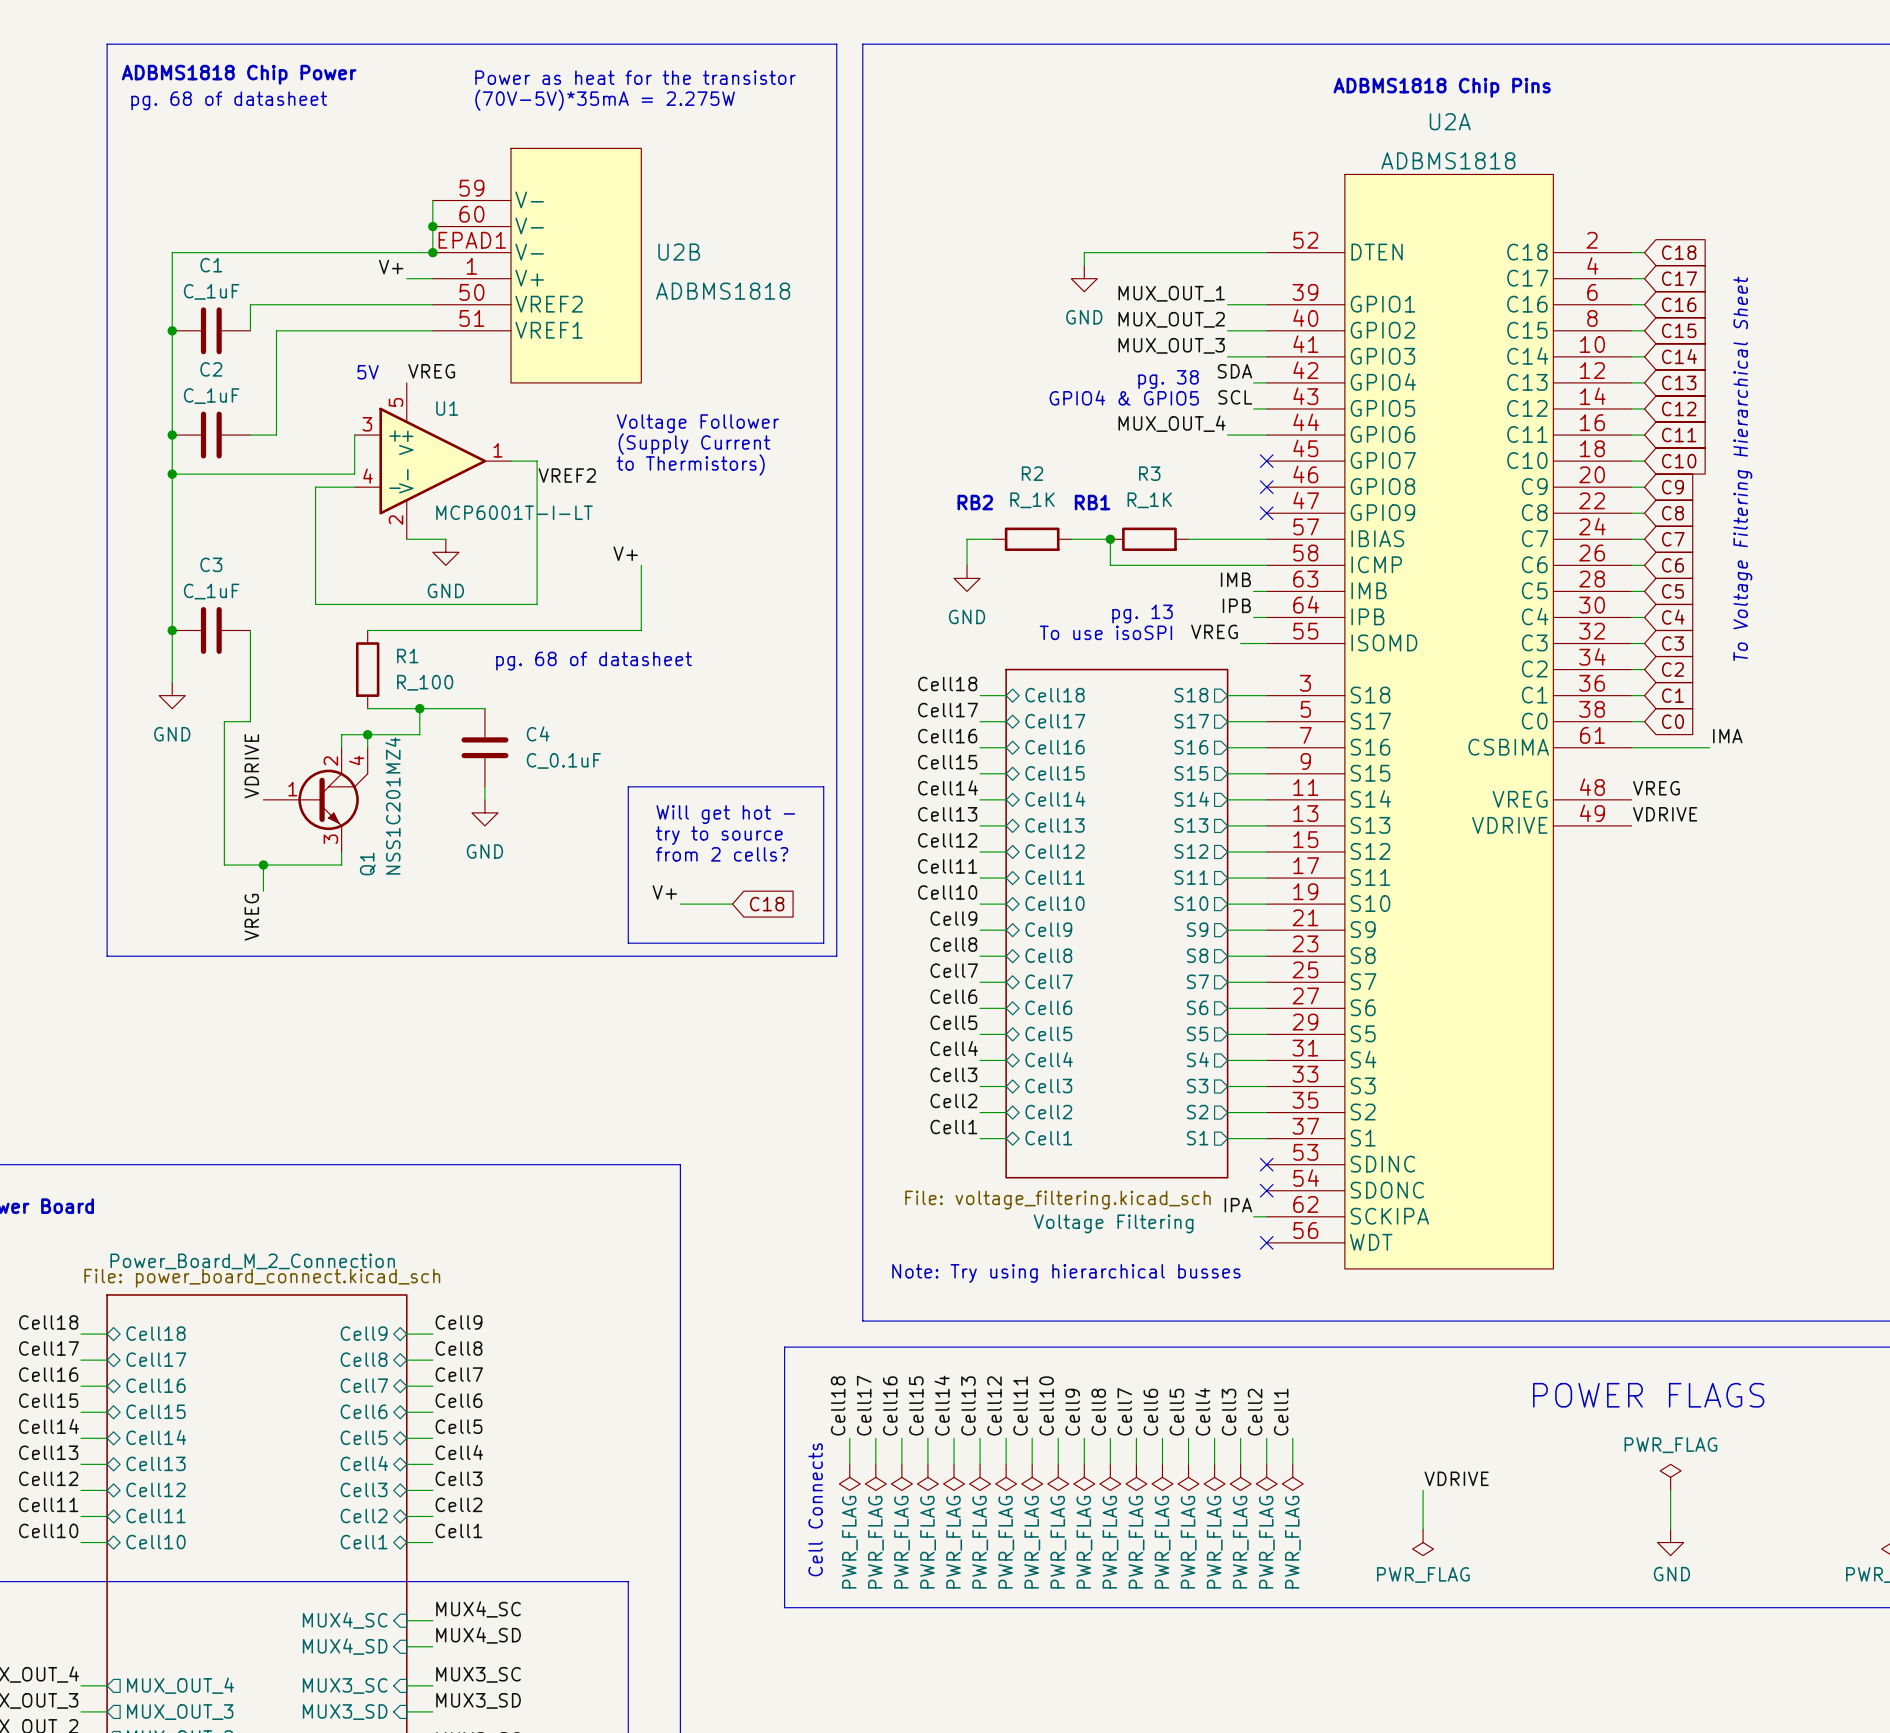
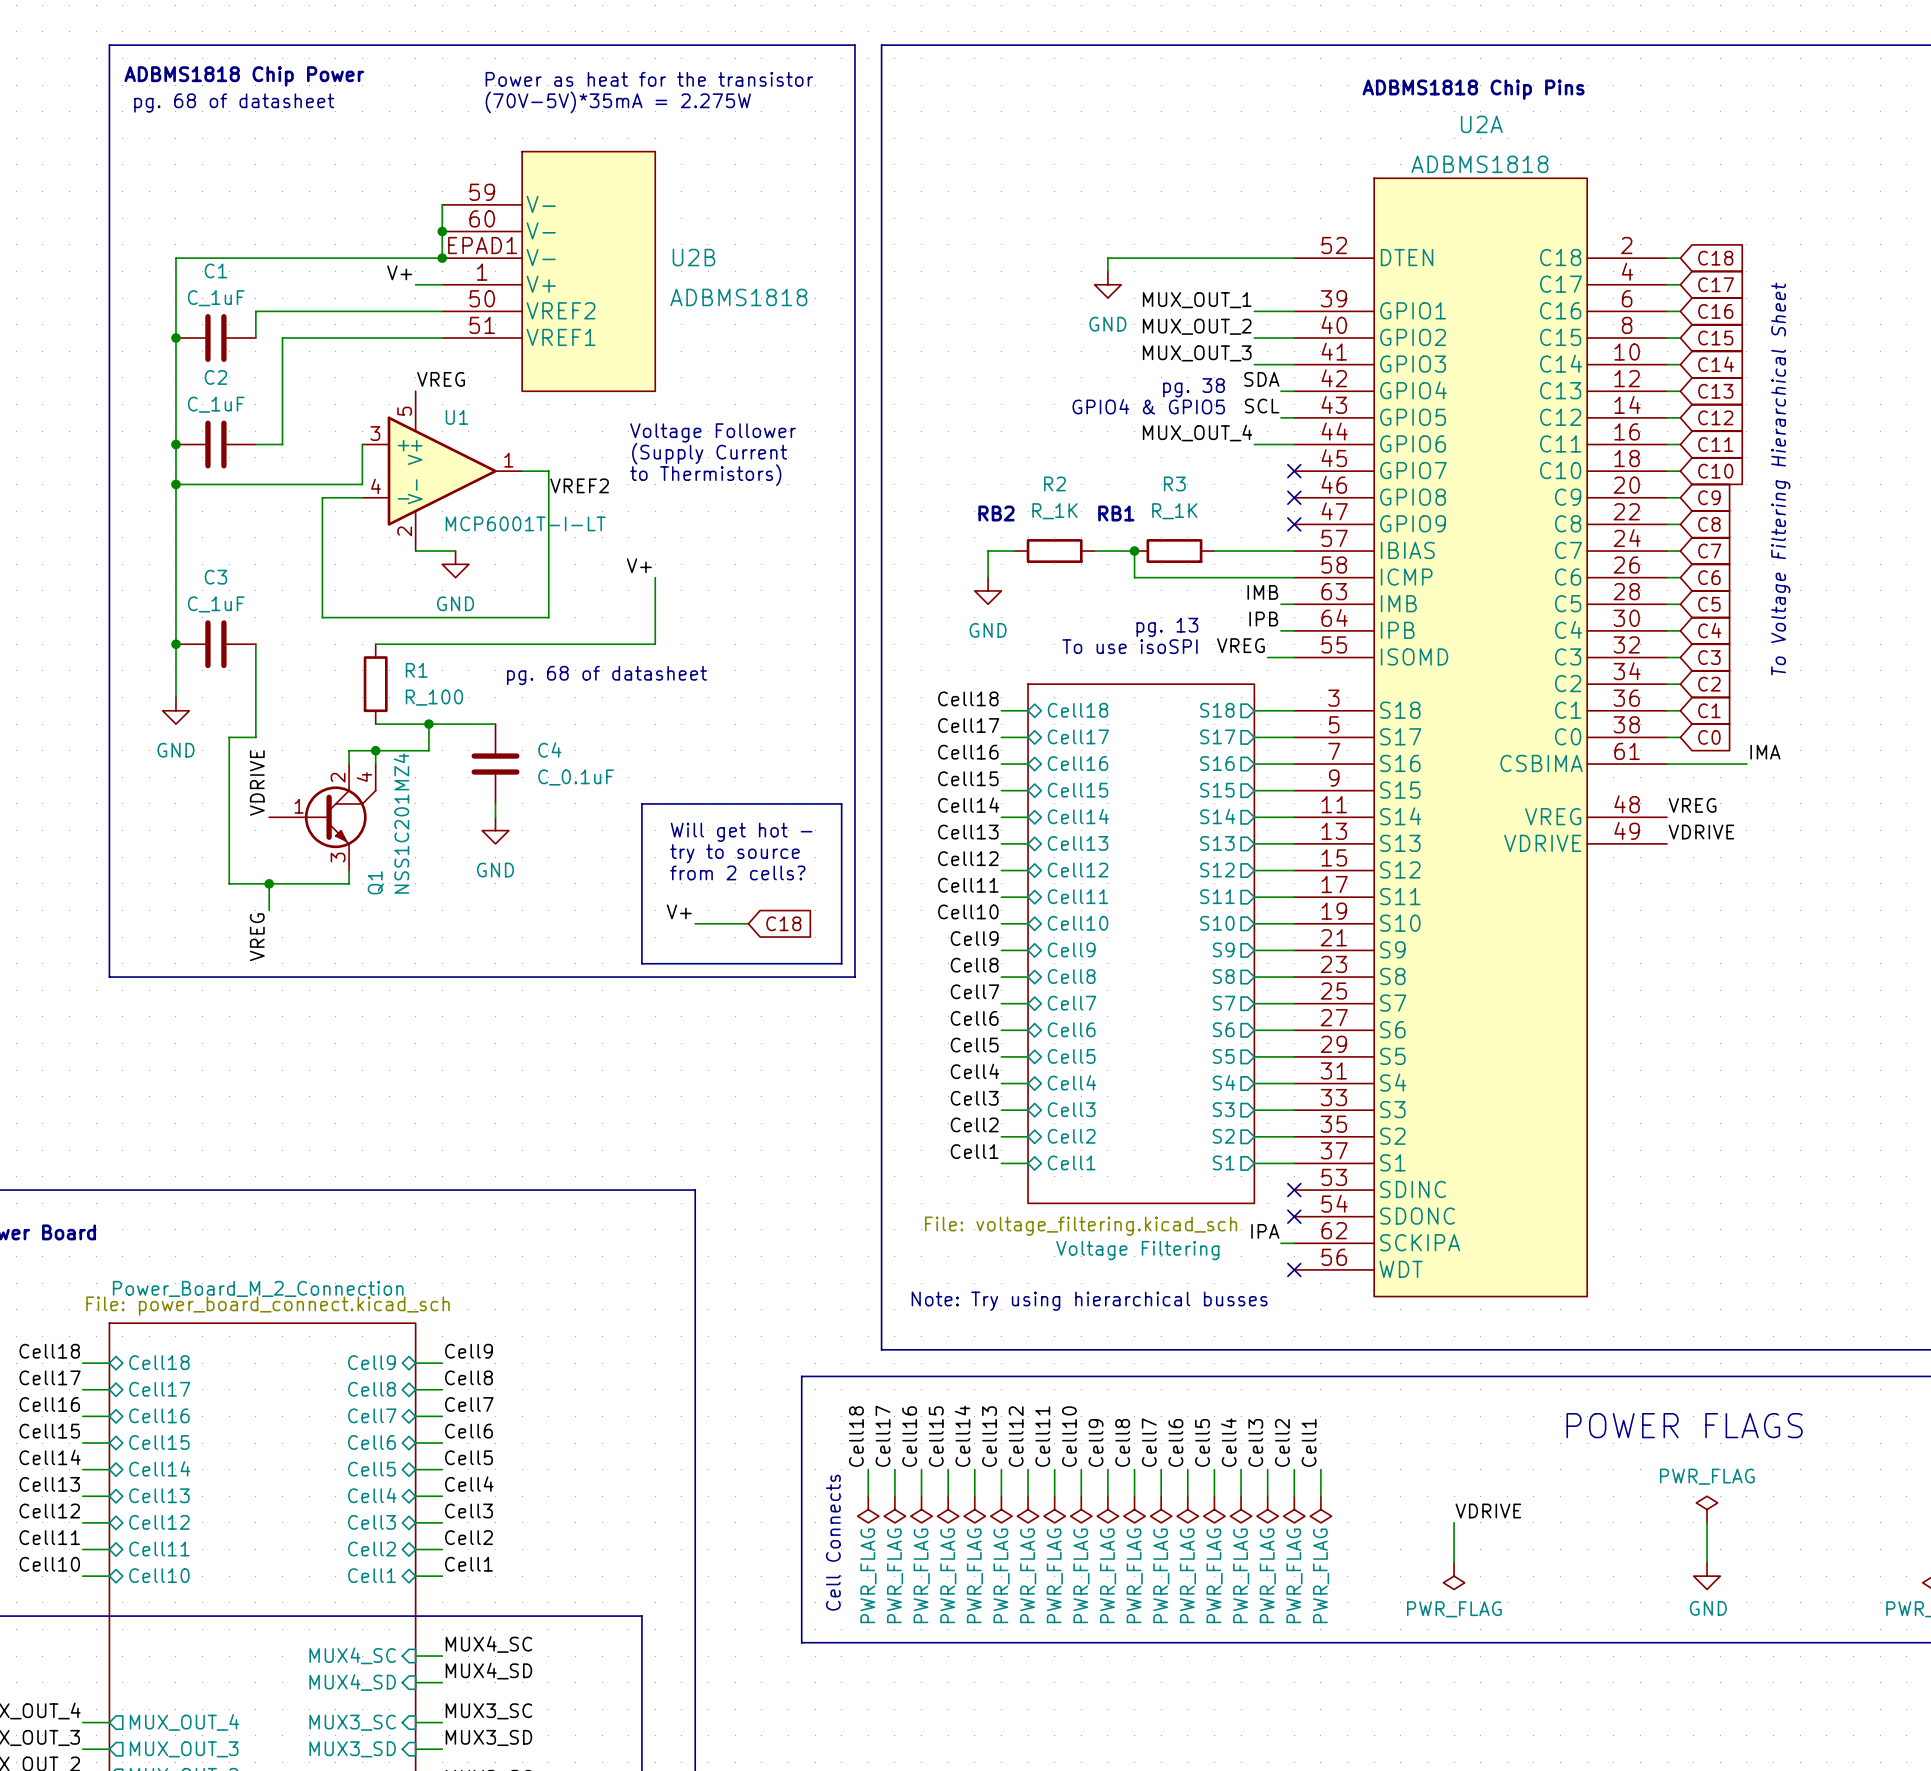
text: 5V (368, 372) -> none

